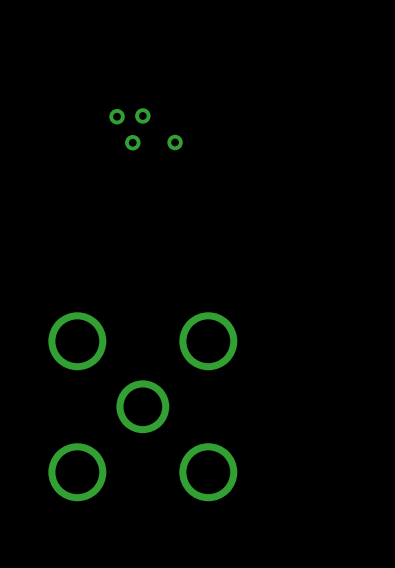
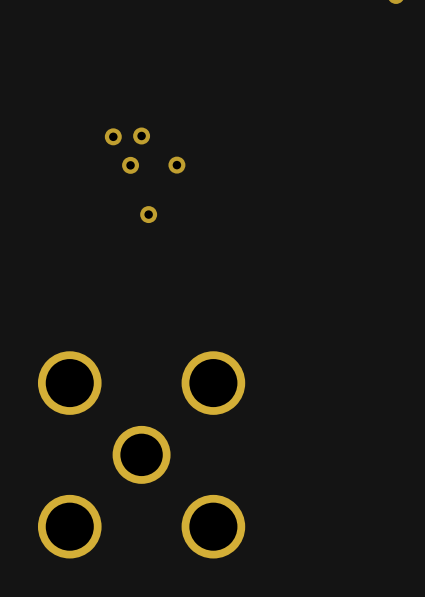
via: none -> (148, 214)

